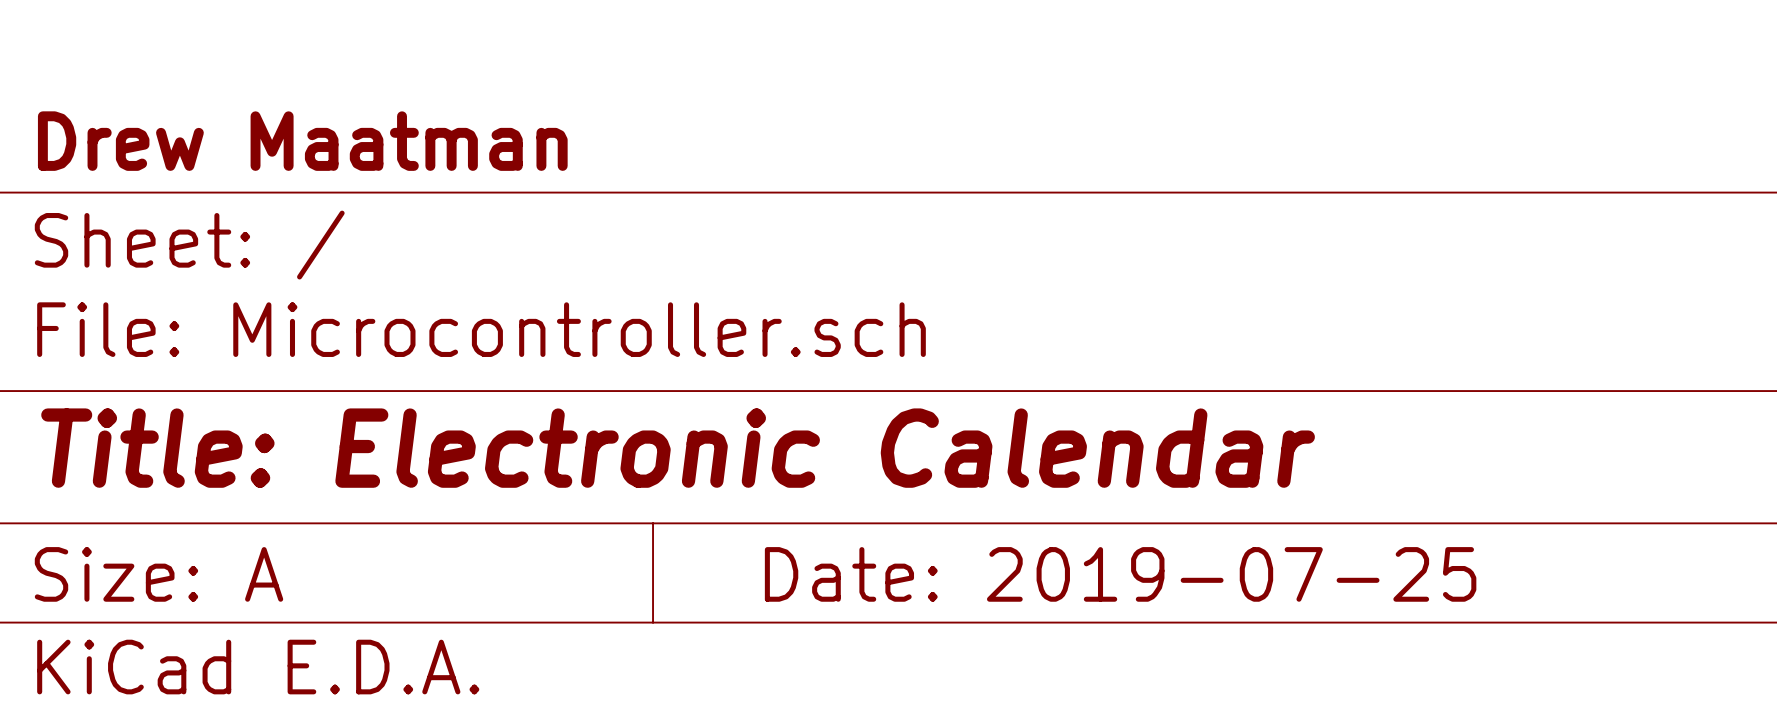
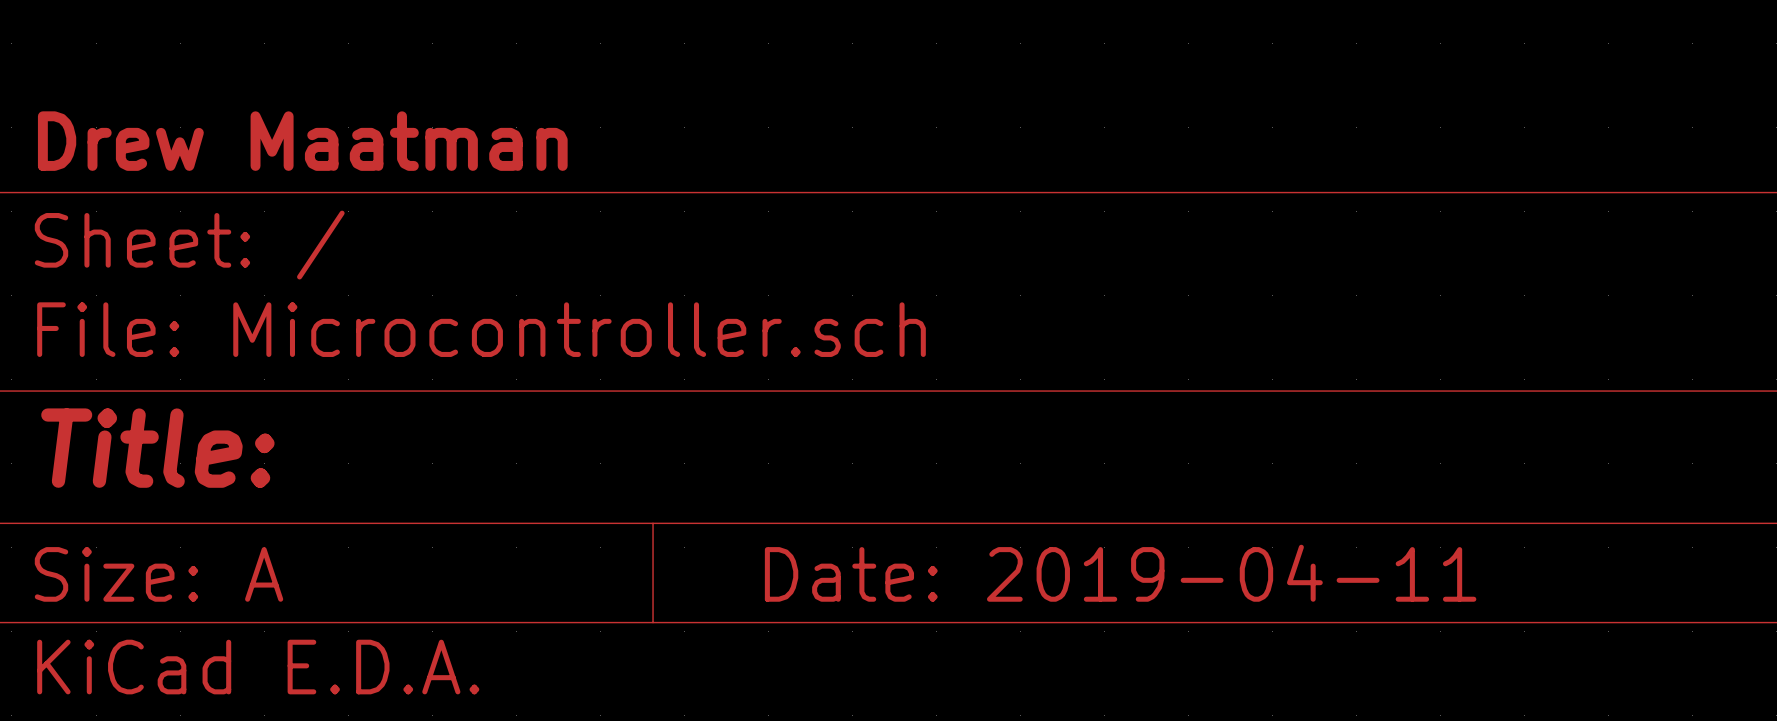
title block: Title: Electronic Calendar (678, 448) -> Title: (157, 448)
title block: Date: 2019-07-25 (1120, 574) -> Date: 2019-04-11 (1120, 573)

